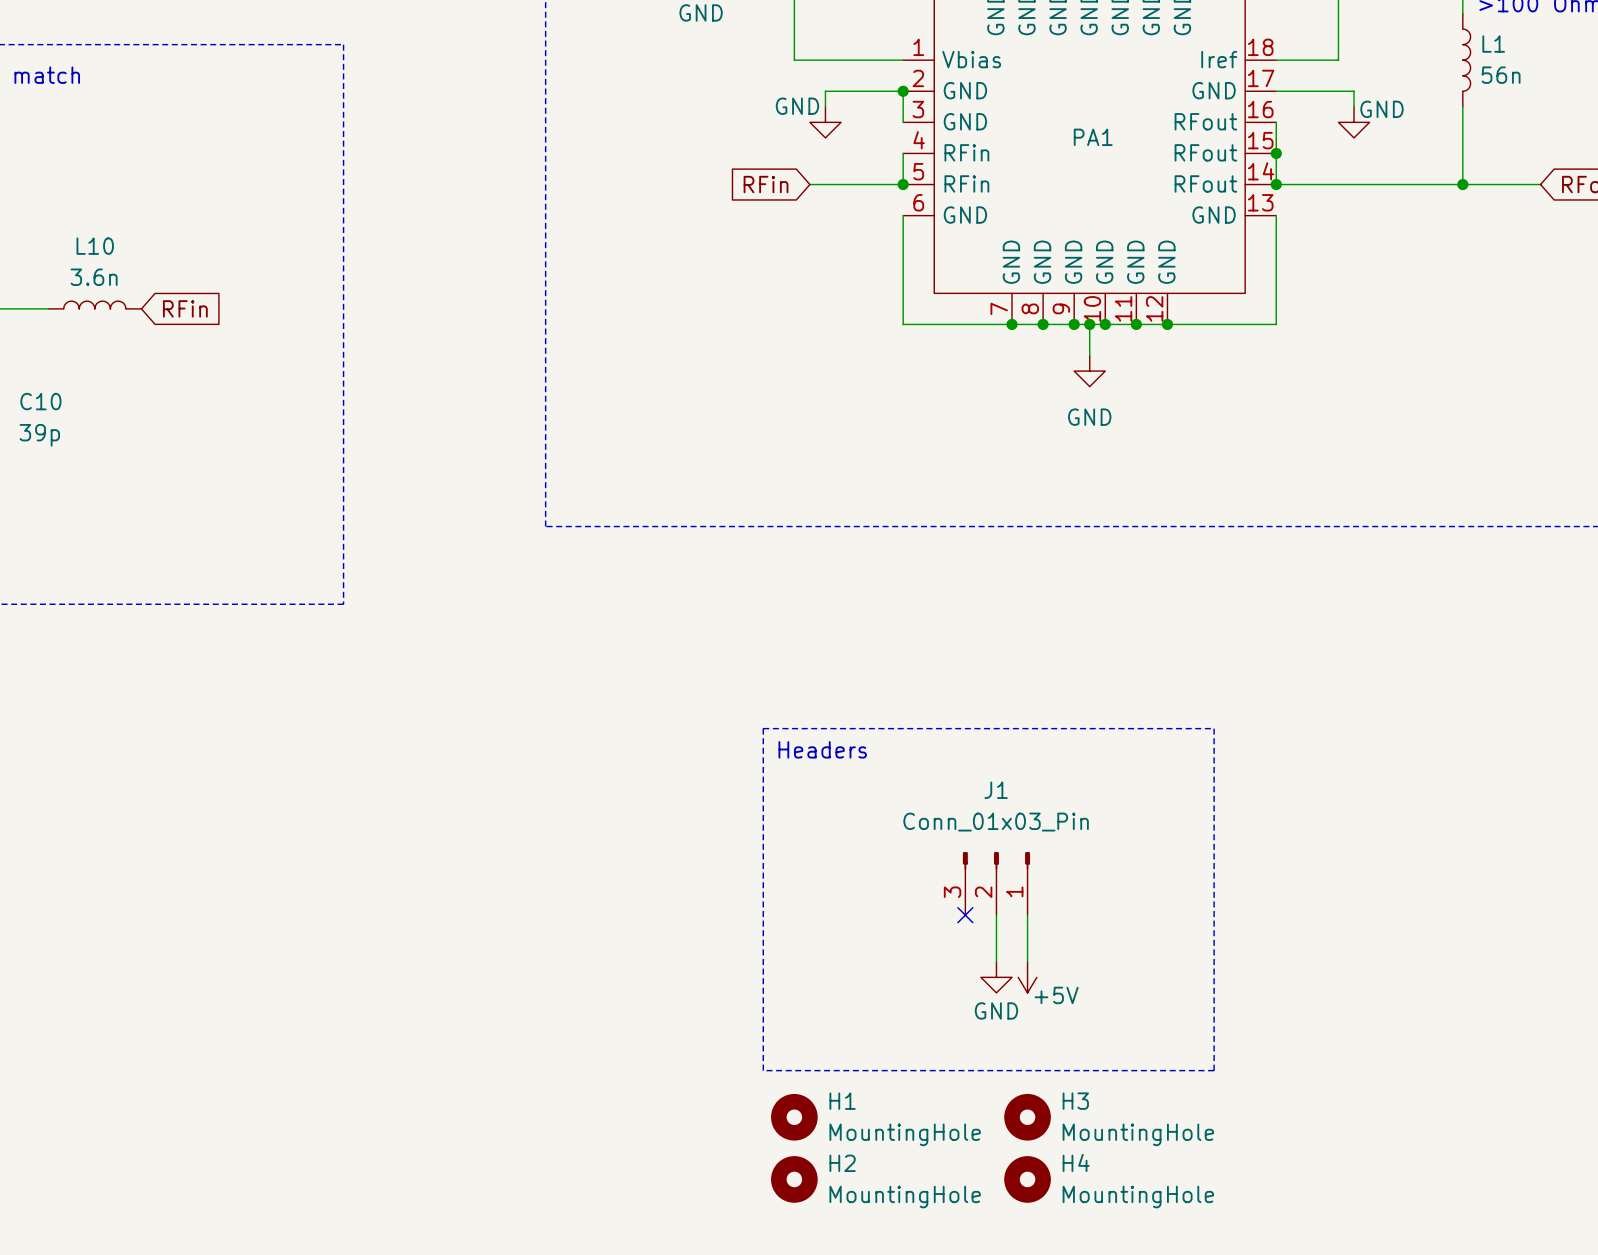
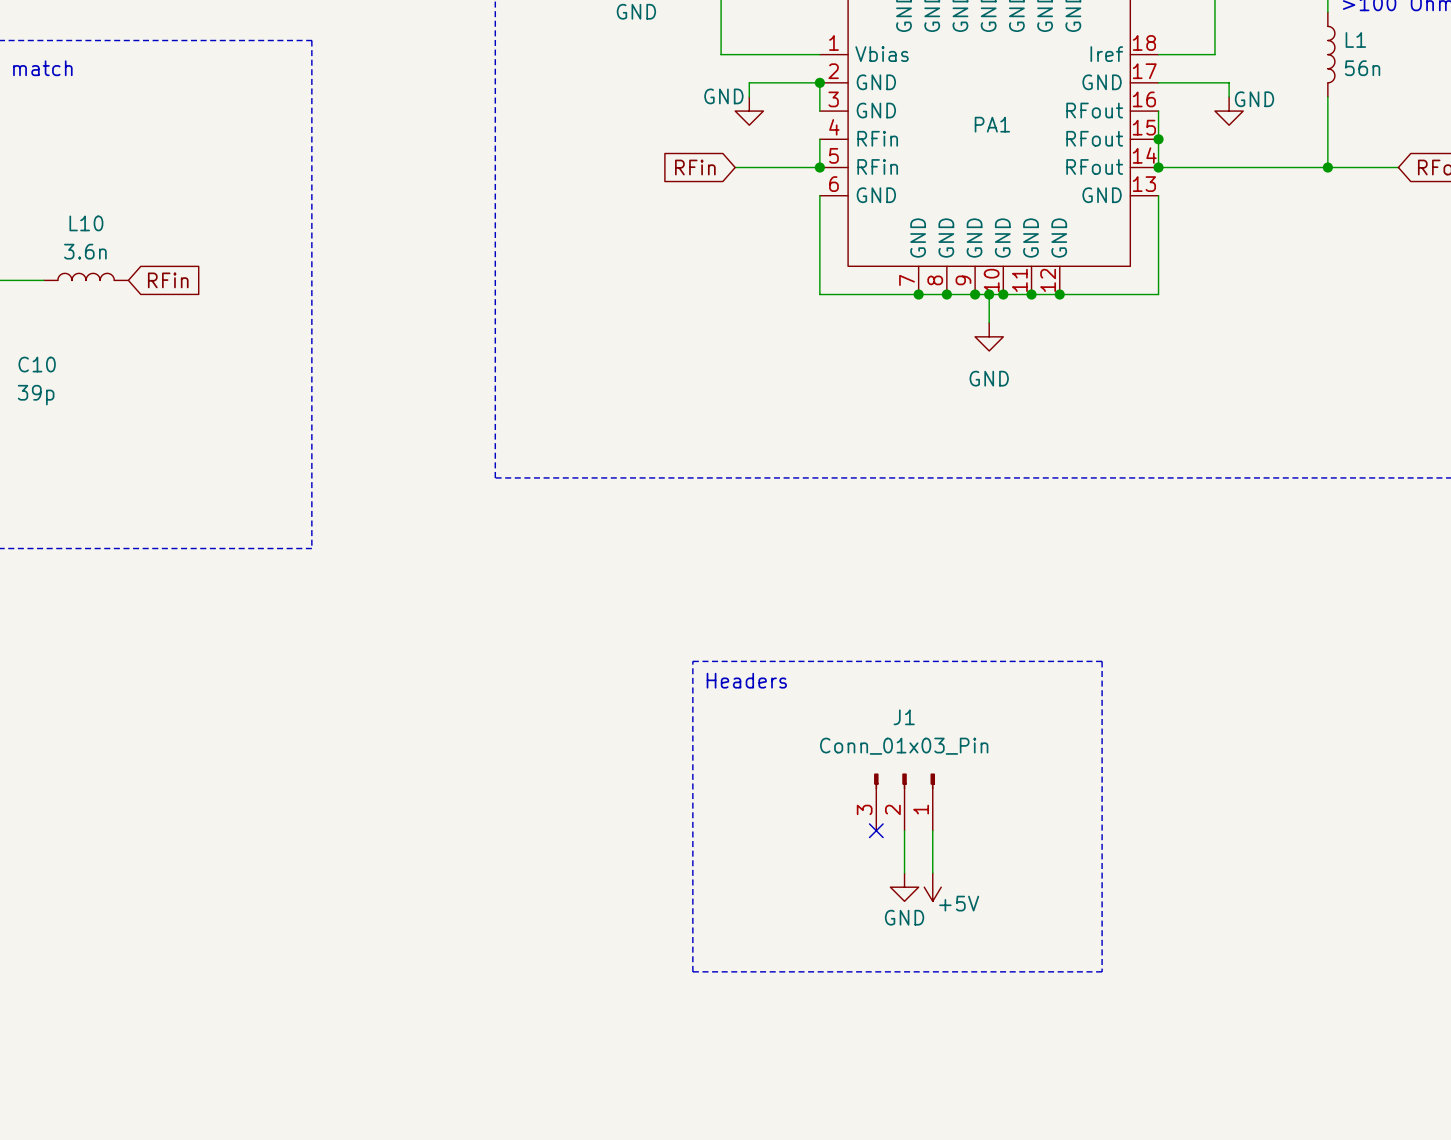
H1: MountingHole (794, 1117) -> none
H3: MountingHole (1027, 1117) -> none
H2: MountingHole (794, 1179) -> none
H4: MountingHole (1027, 1179) -> none

